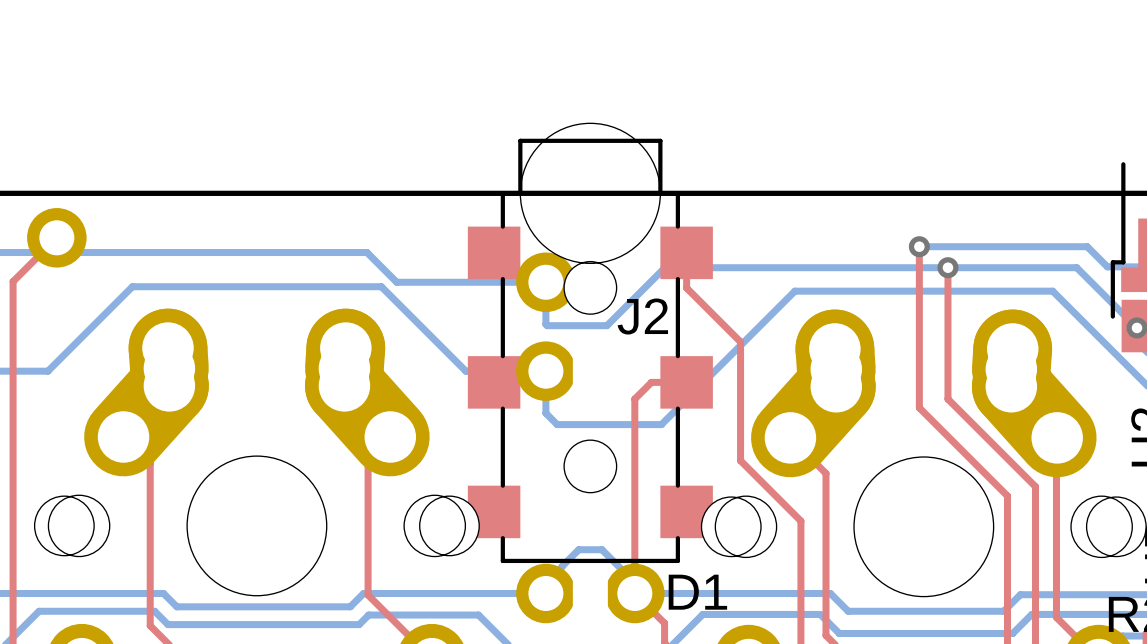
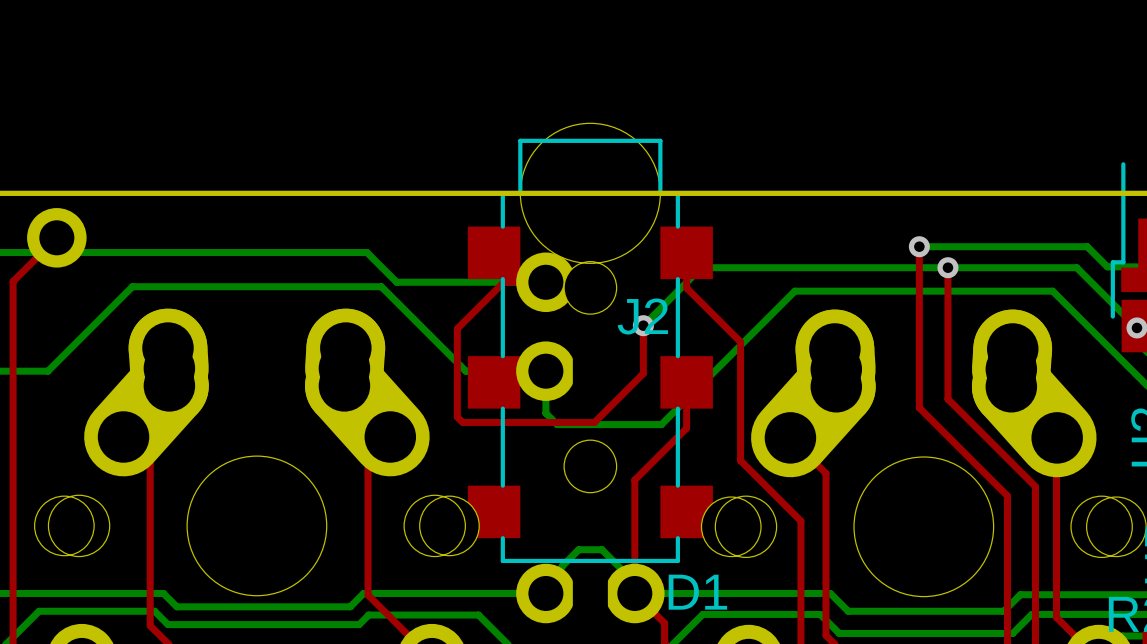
bottom track: (701, 267) (664, 267) (606, 325) (547, 325) (545, 282) -> (701, 267) (643, 325)
top track: none -> (523, 282) (503, 282) (457, 328) (457, 417) (462, 422) (594, 422) (643, 373) (643, 325)
via: none -> (643, 325)
top track: (686, 382) (651, 382) (634, 399) (634, 480) -> (686, 382) (686, 428) (634, 480)

